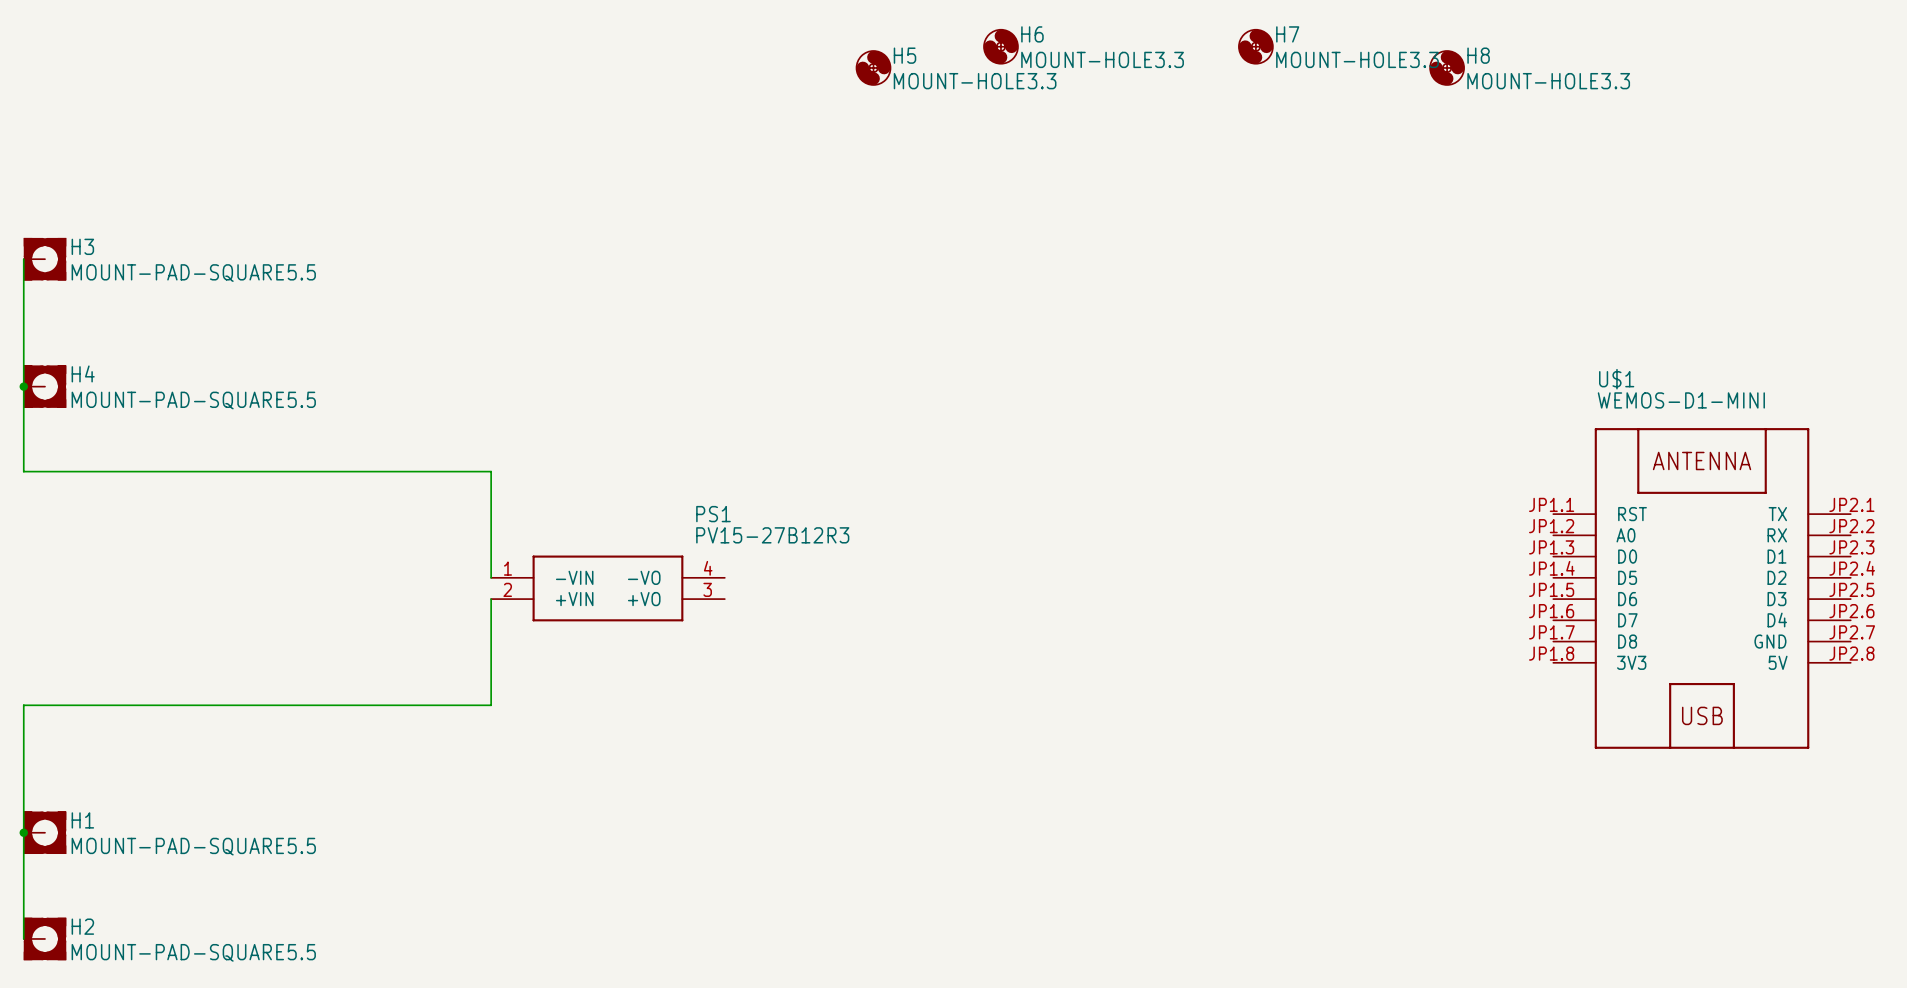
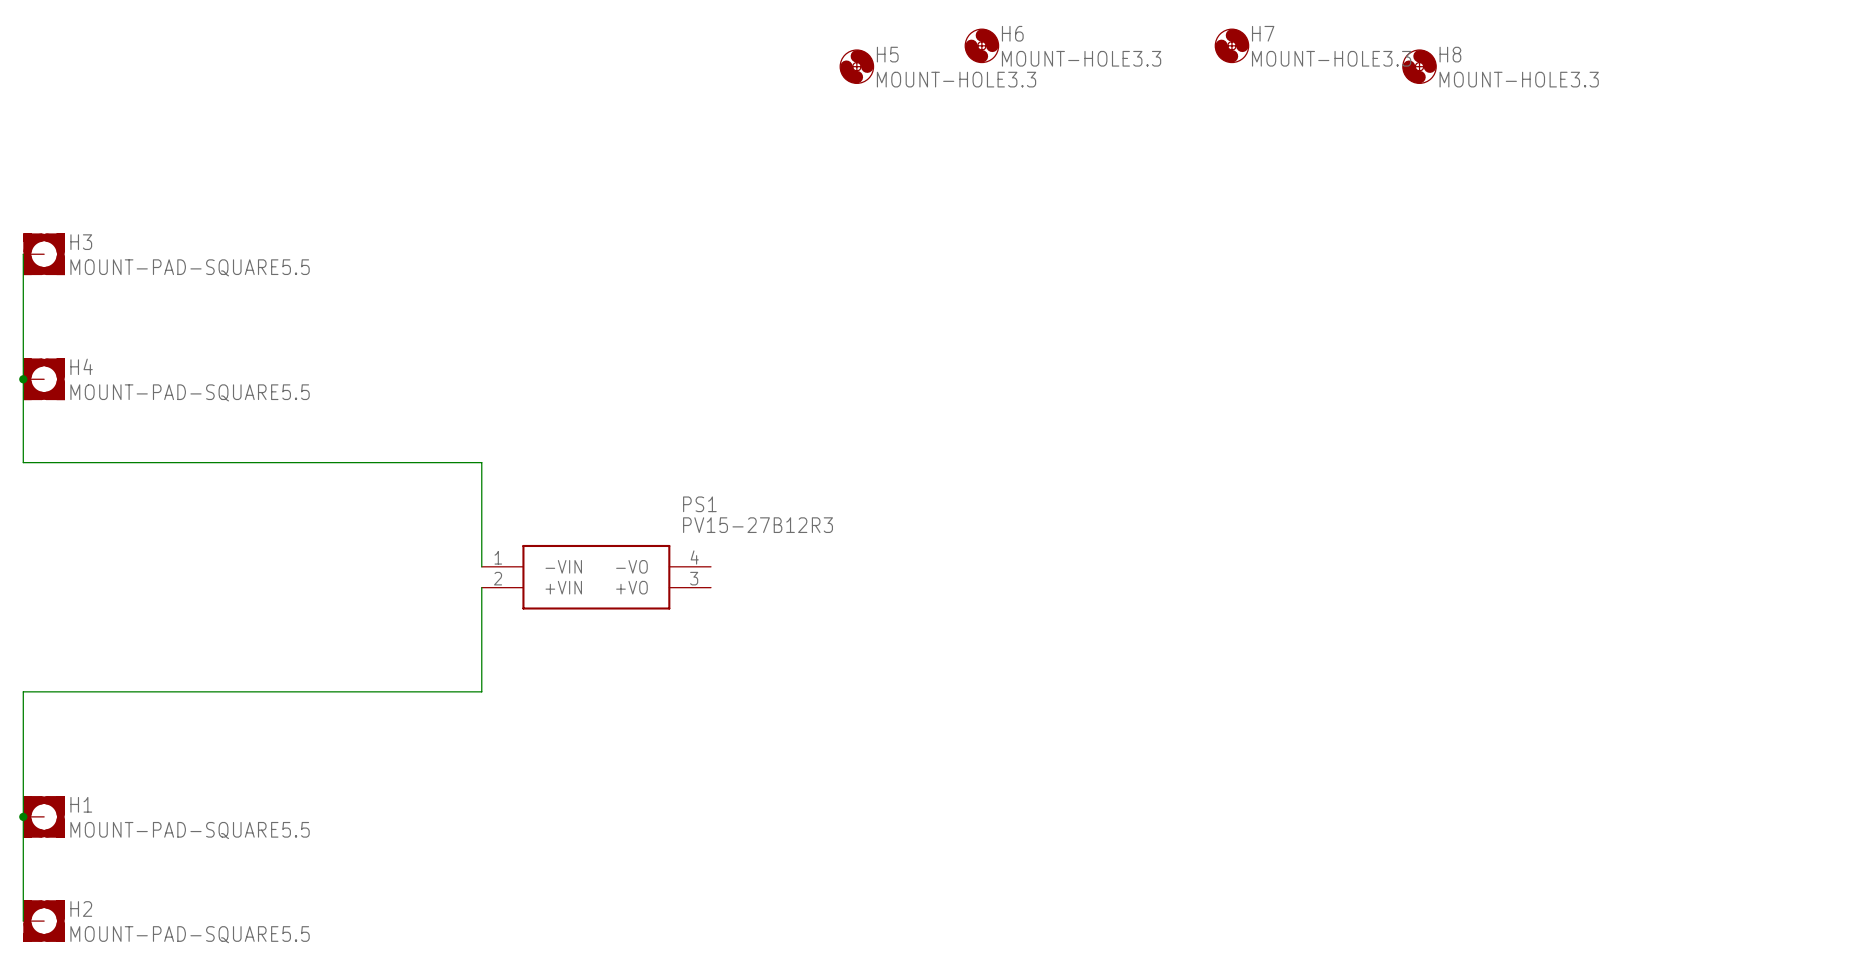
U$1: WEMOS-D1-MINI (1702, 588) -> none

